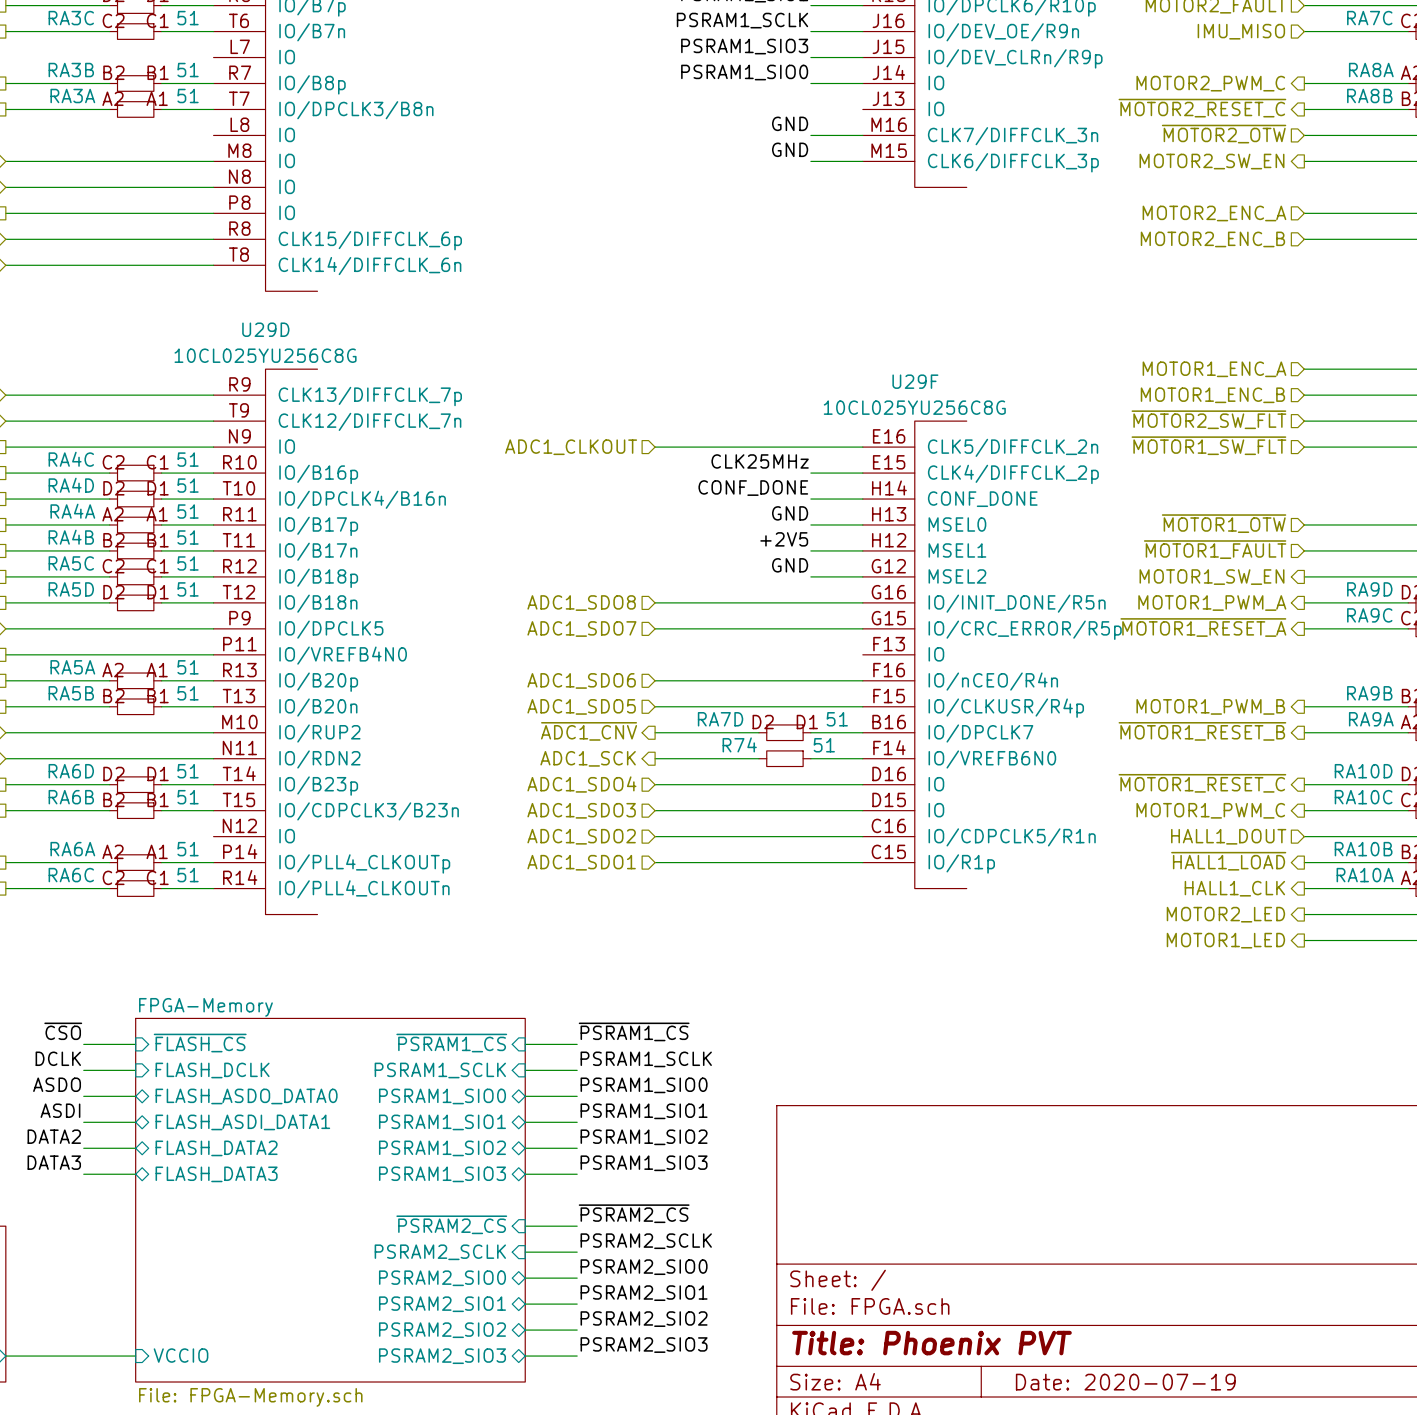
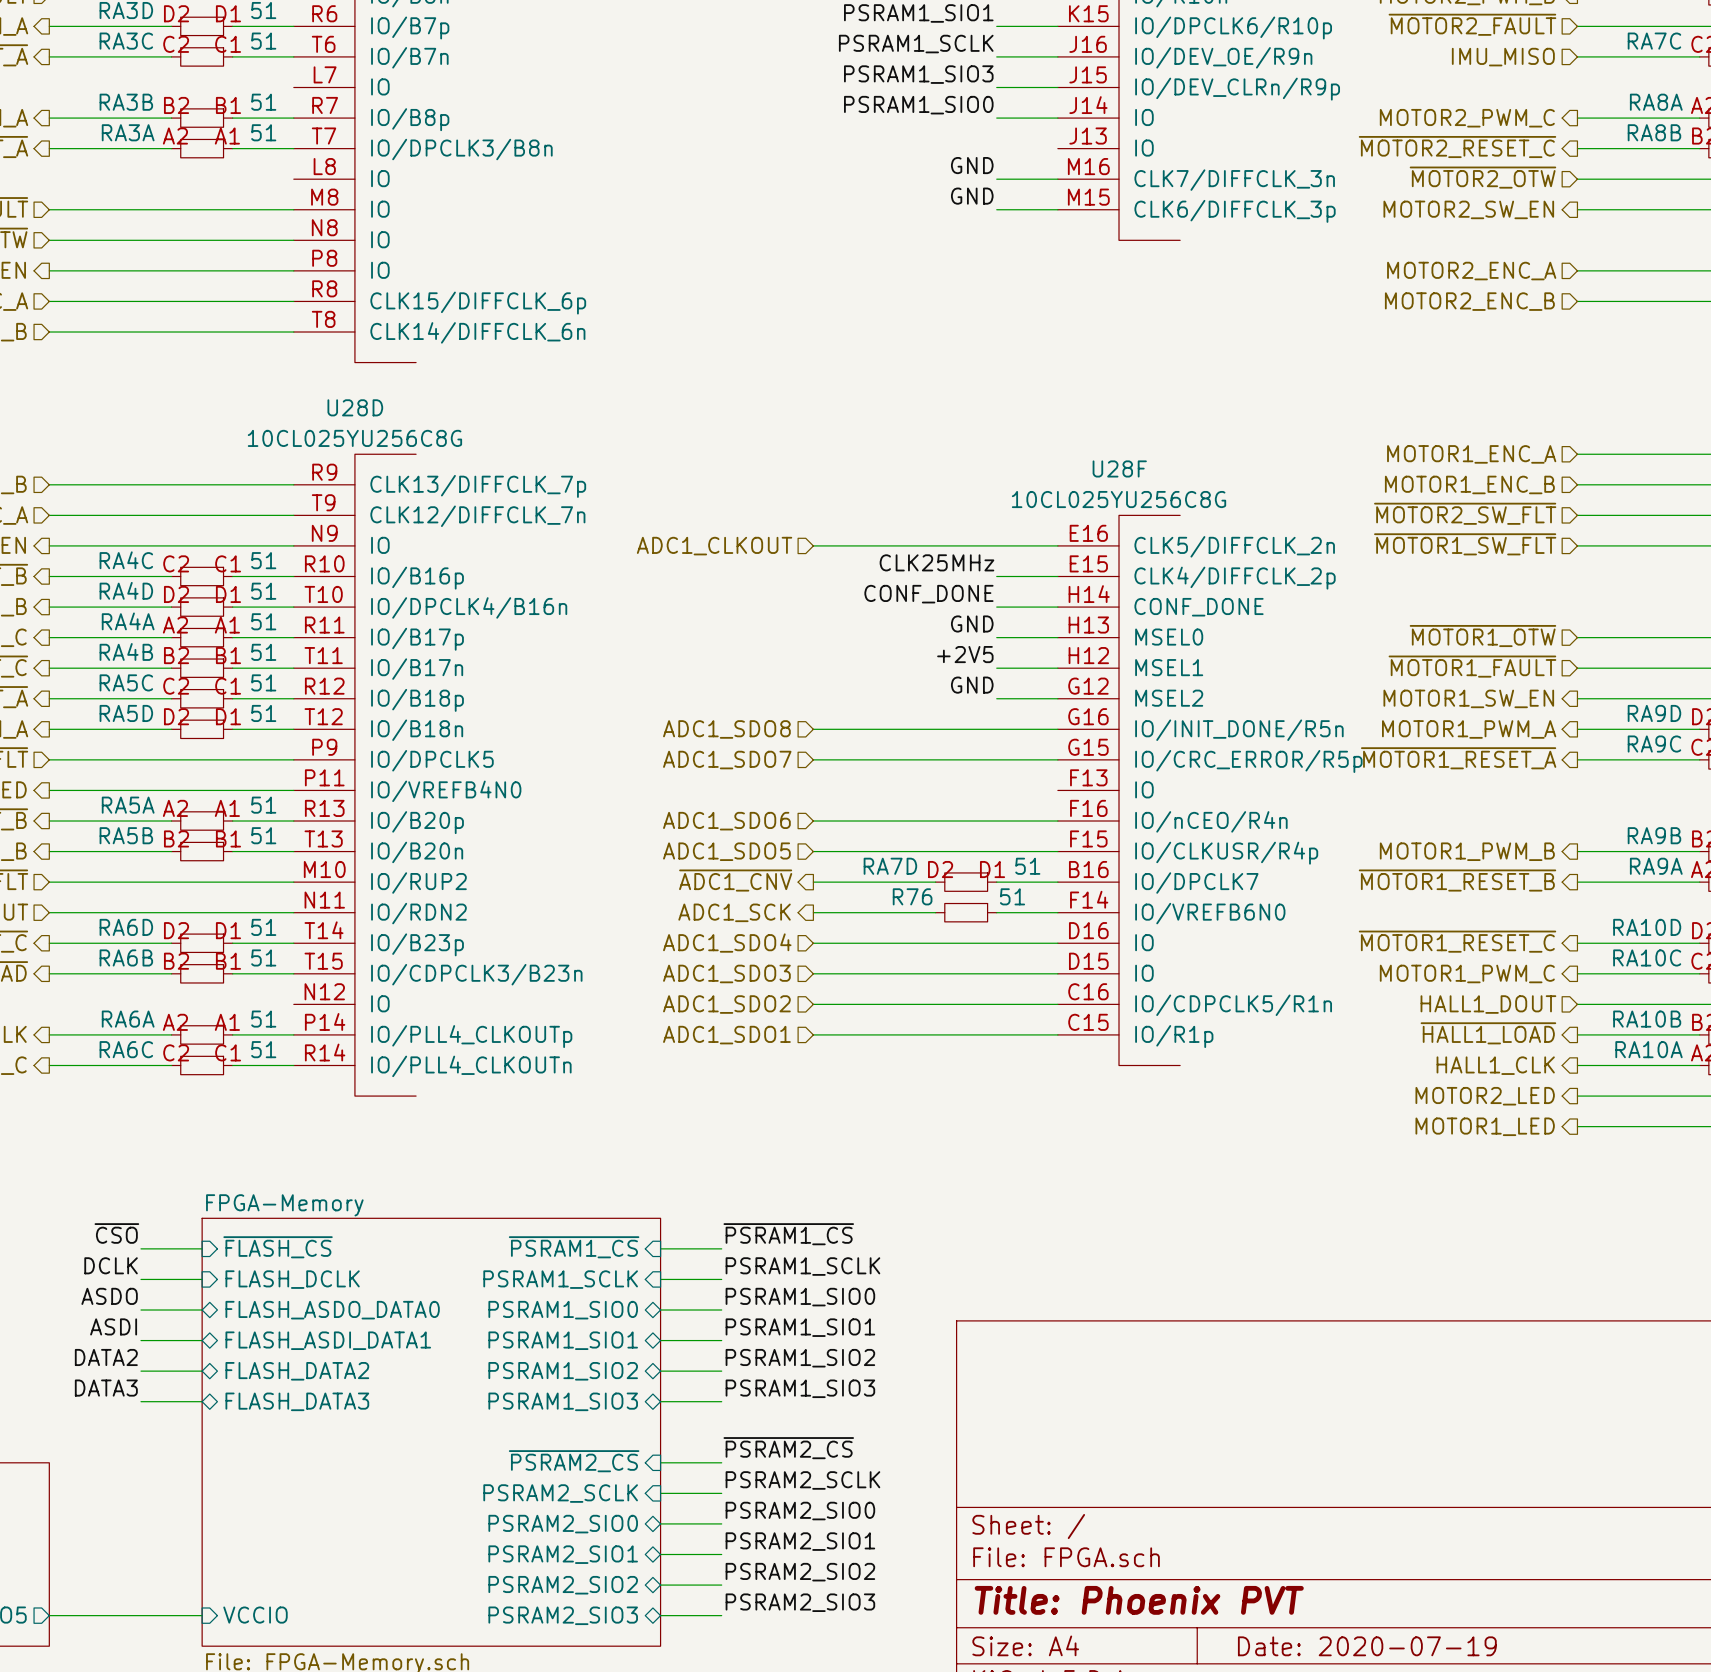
U29D name: U29D (265, 329) -> U28D (355, 407)
U29F name: U29F (915, 381) -> U28F (1119, 468)
R74 name: R74 (739, 744) -> R76 (912, 896)

